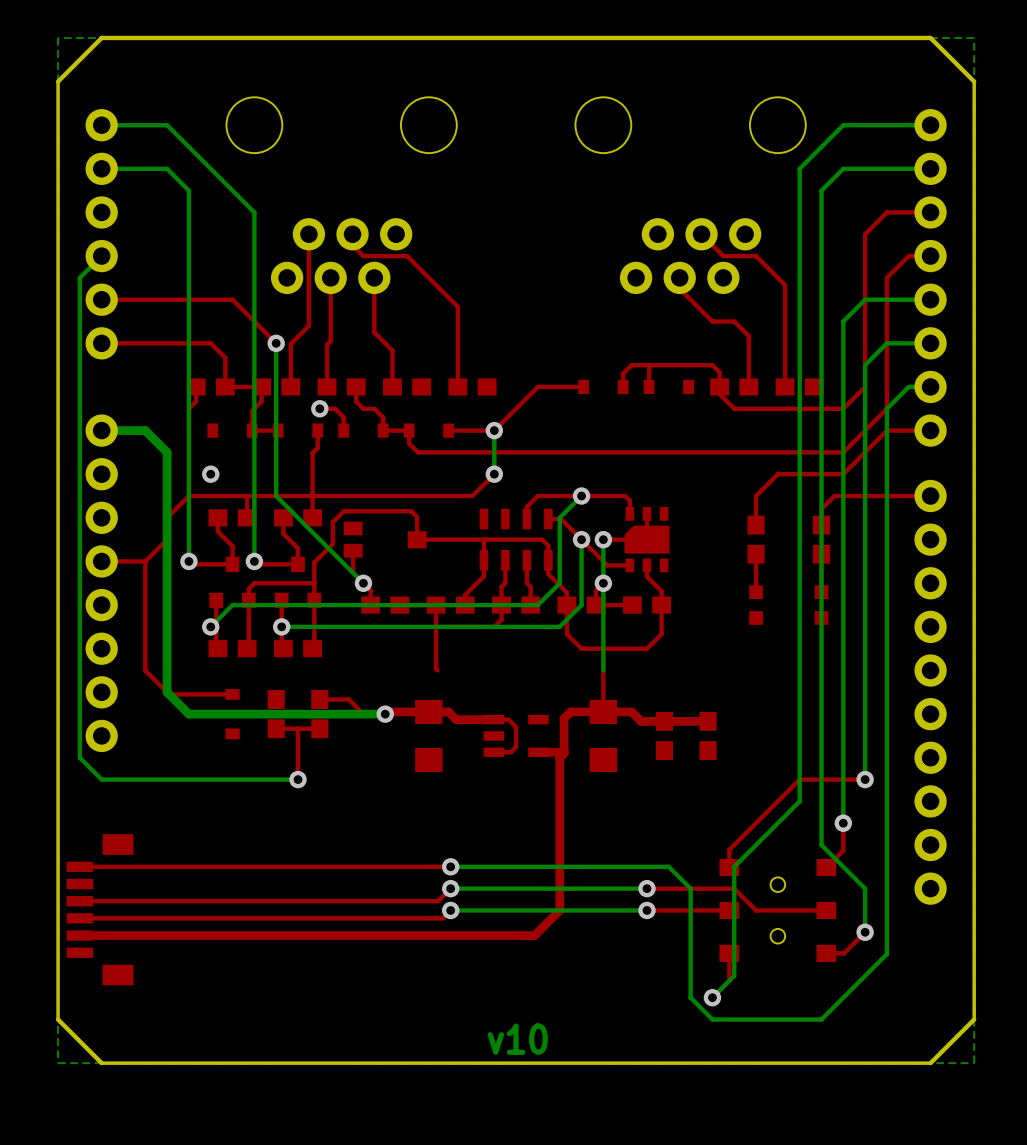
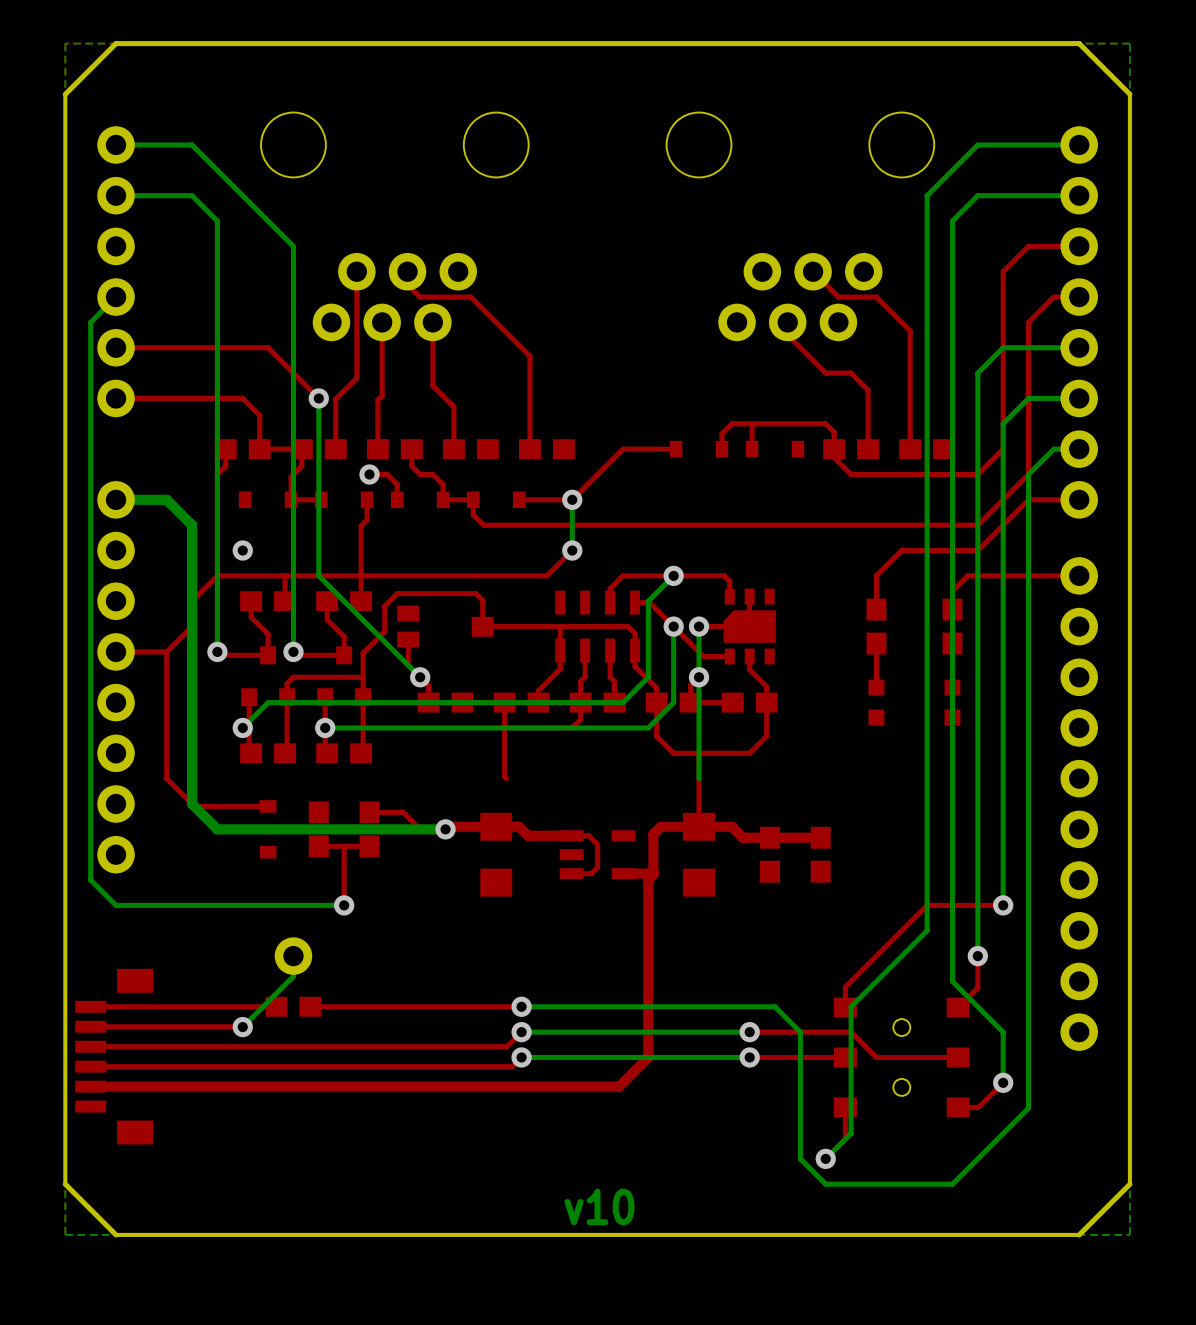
bottom track: none -> (293, 956) (293, 976) (242, 1027)
part: none -> (293, 956)
part: none -> (293, 1006)
top track: (268, 866) (239, 866) -> none
top track: none -> (90, 1026) (242, 1027)
via: none -> (242, 1027)

